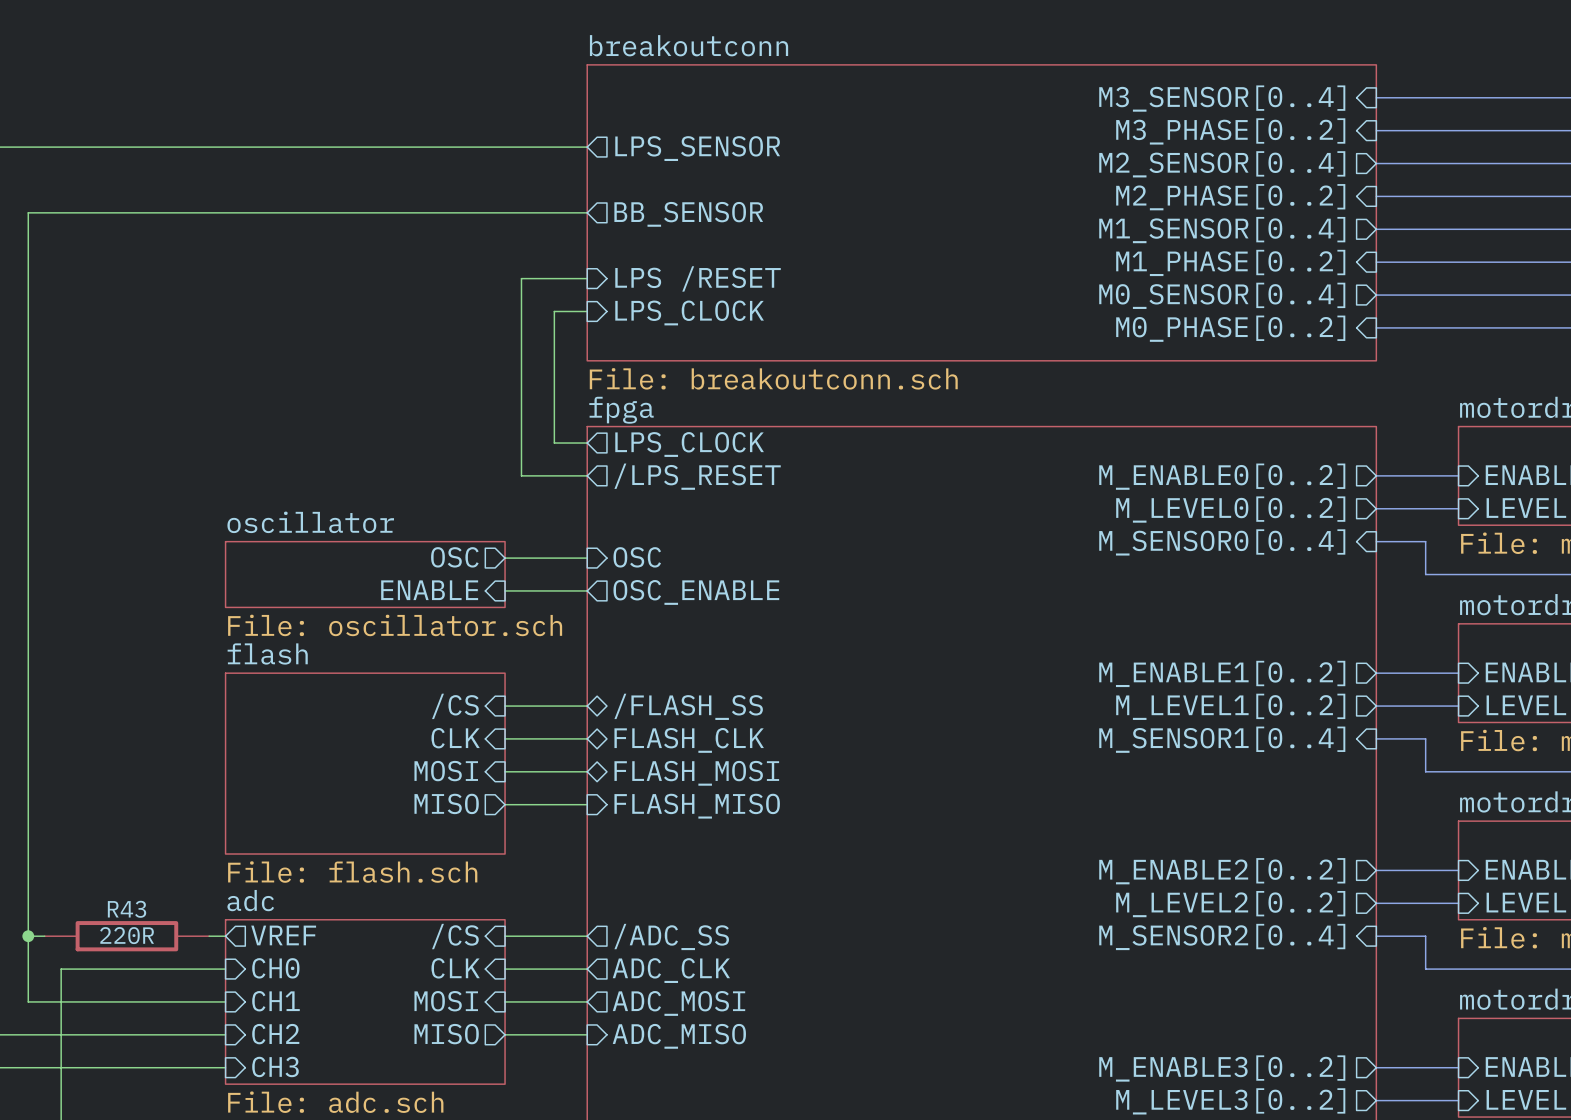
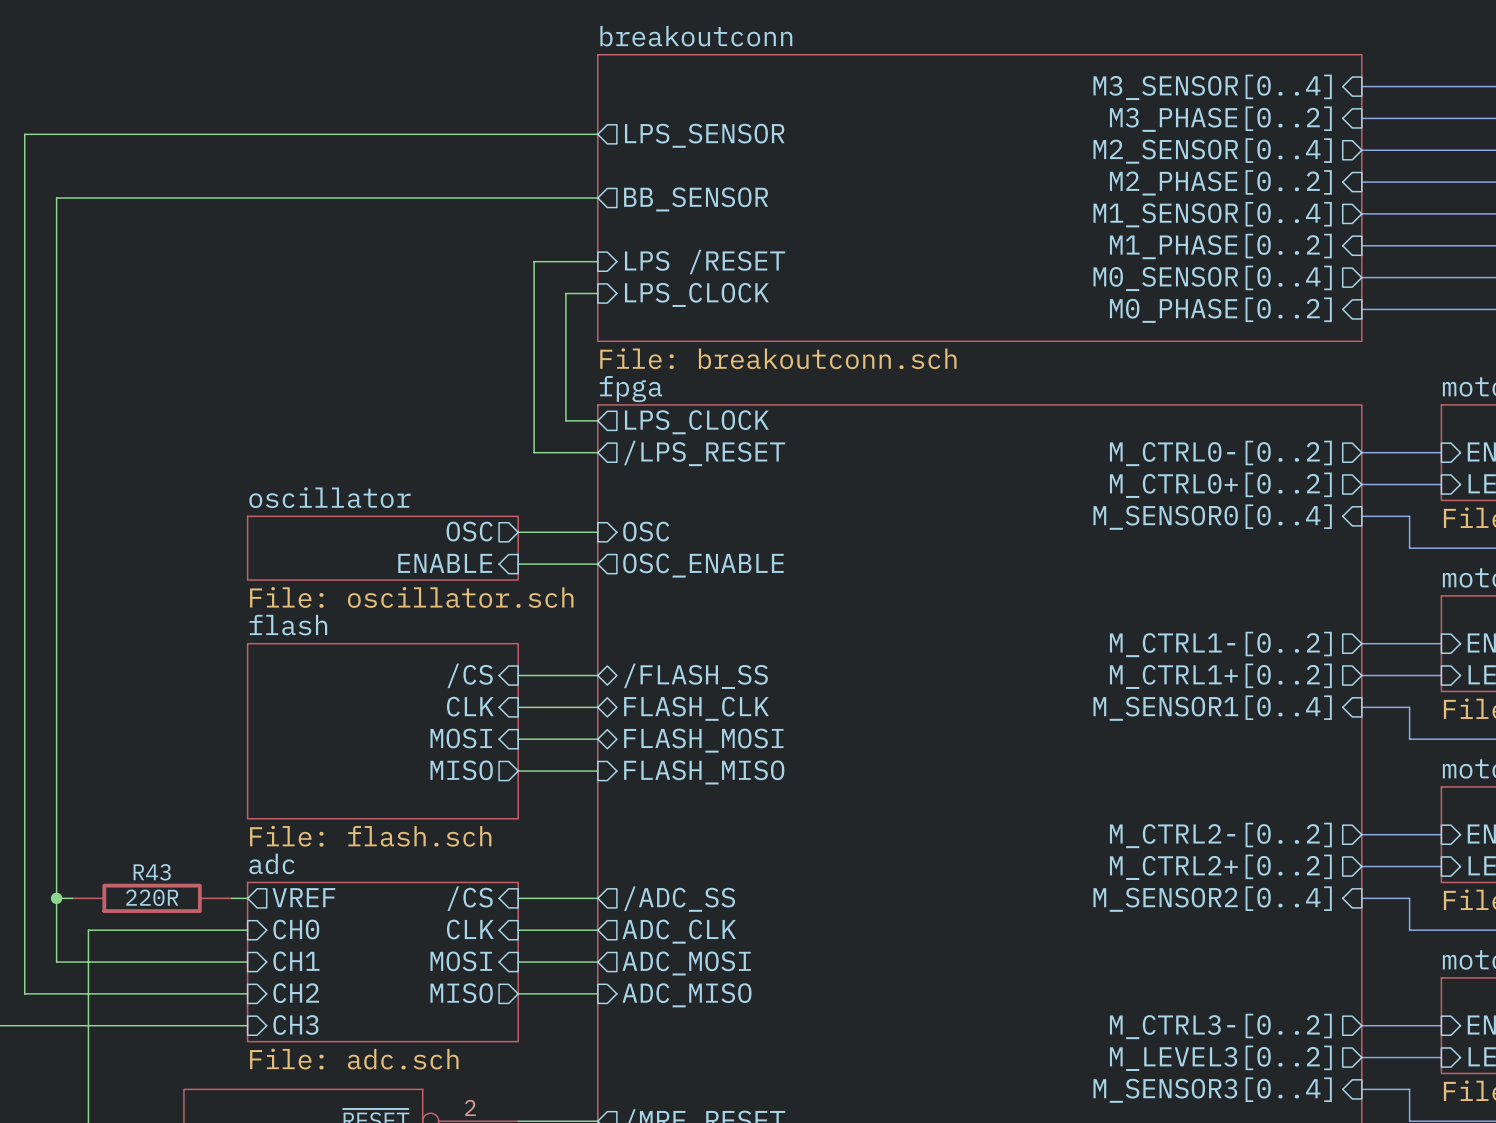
sheet pin: M_ENABLE0[0..2] (1222, 476) -> M_CTRL0-[0..2] (1220, 453)
sheet pin: M_LEVEL0[0..2] (1230, 509) -> M_CTRL0+[0..2] (1220, 485)
sheet pin: M_ENABLE1[0..2] (1222, 673) -> M_CTRL1-[0..2] (1220, 644)
sheet pin: M_LEVEL1[0..2] (1230, 706) -> M_CTRL1+[0..2] (1220, 676)
sheet pin: M_ENABLE2[0..2] (1222, 871) -> M_CTRL2-[0..2] (1220, 835)
sheet pin: M_LEVEL2[0..2] (1230, 904) -> M_CTRL2+[0..2] (1220, 867)
sheet pin: M_ENABLE3[0..2] (1222, 1068) -> M_CTRL3-[0..2] (1220, 1026)

